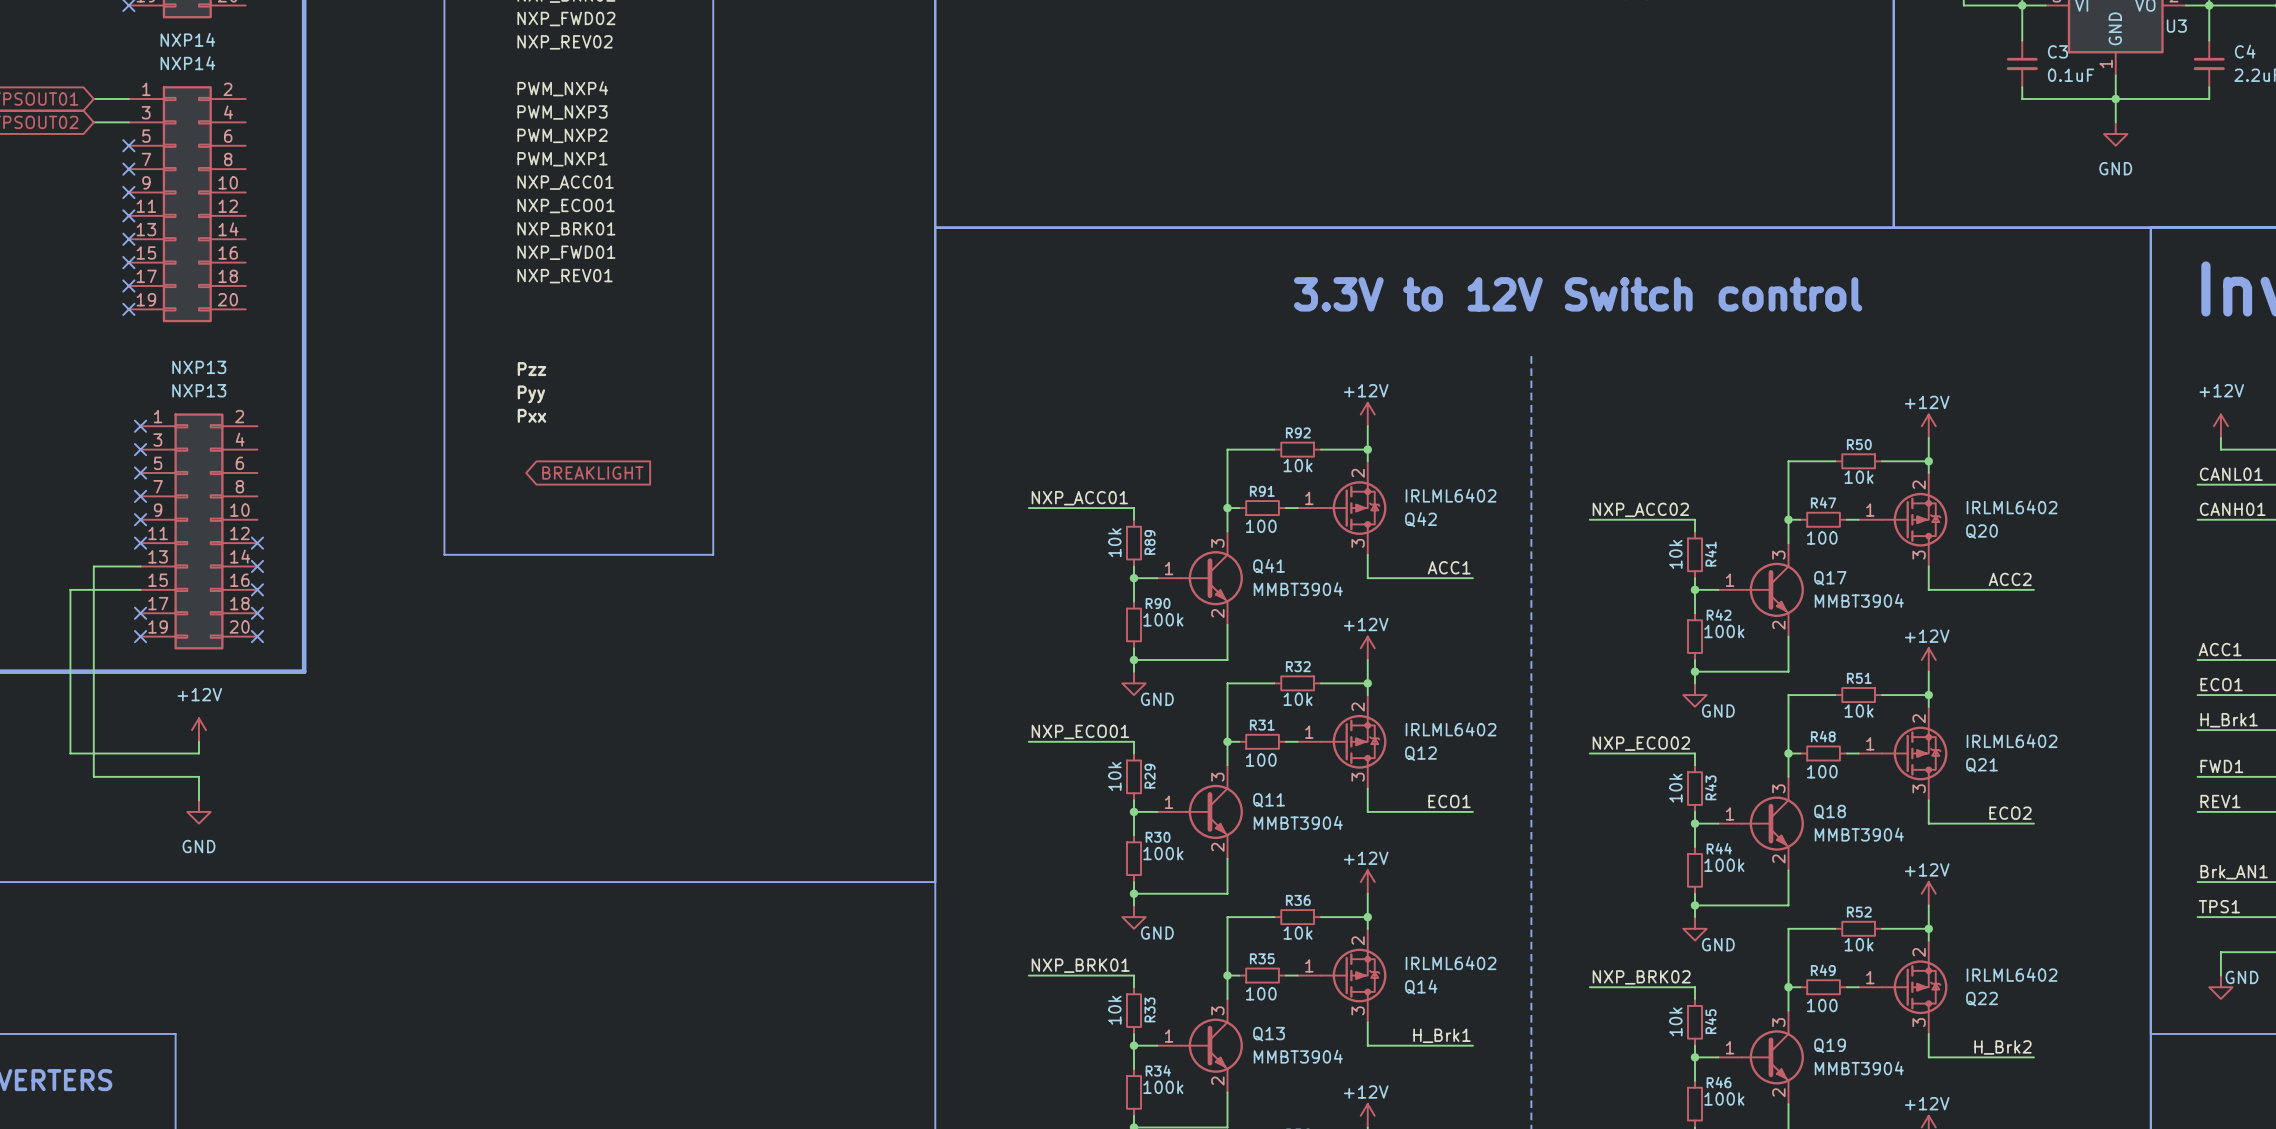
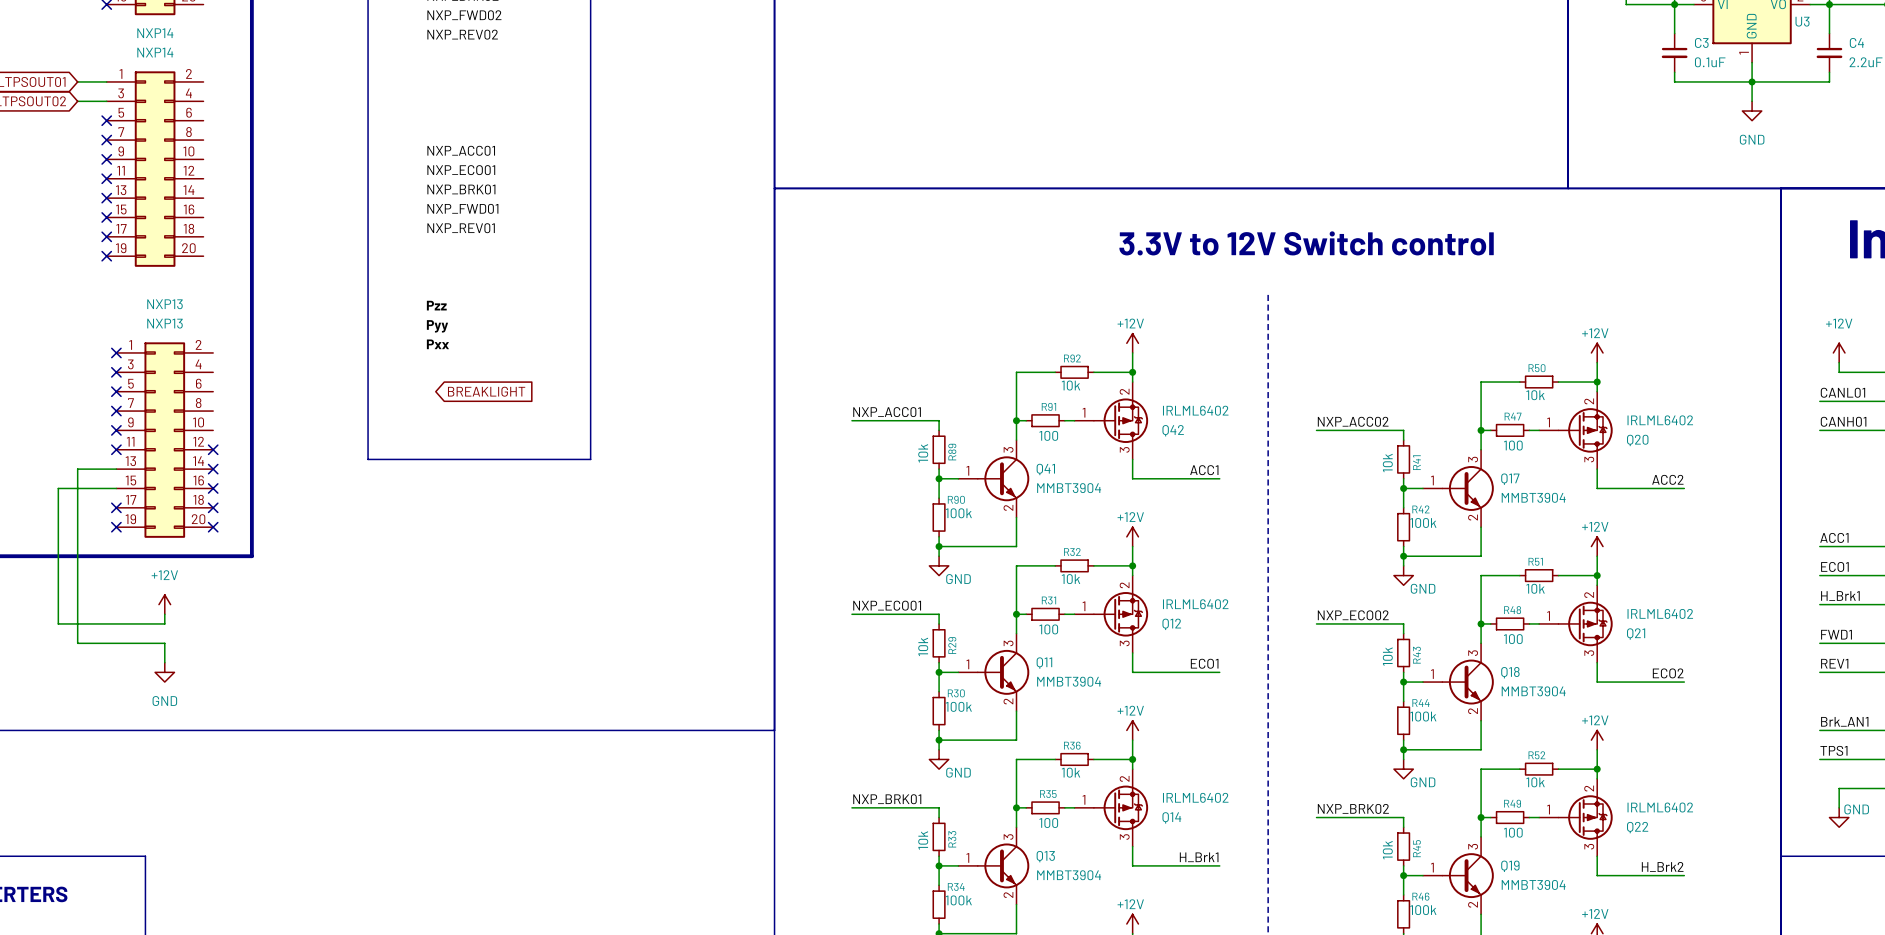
label: PWM_NXP4 (562, 88) -> none
label: PWM_NXP3 (562, 112) -> none
label: PWM_NXP2 (562, 135) -> none
label: PWM_NXP1 (562, 159) -> none

